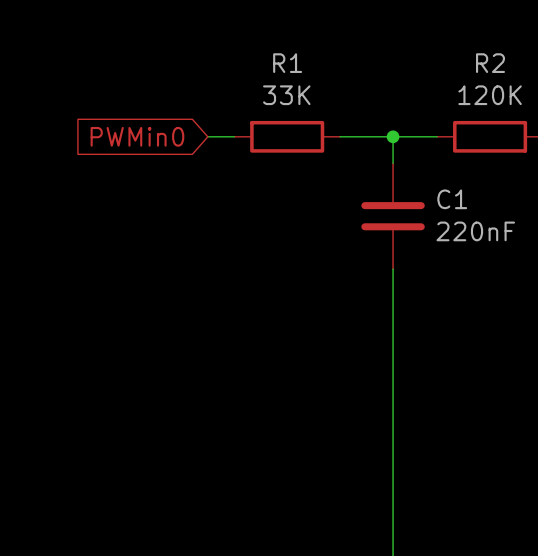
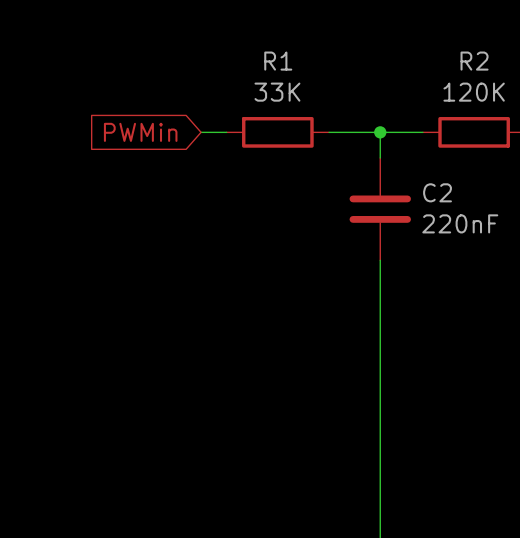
global label: PWMin0 (137, 136) -> PWMin (140, 132)
C1 name: C1 (452, 199) -> C2 (437, 192)

